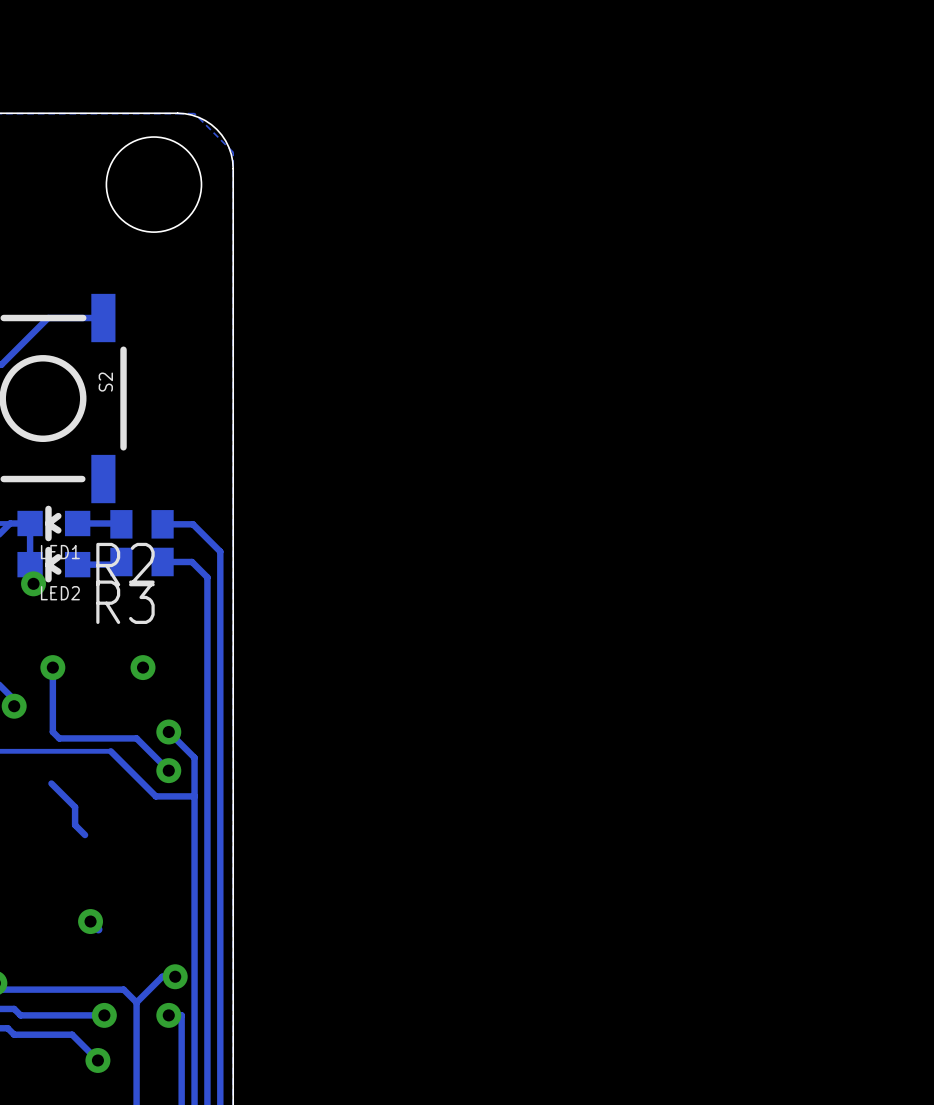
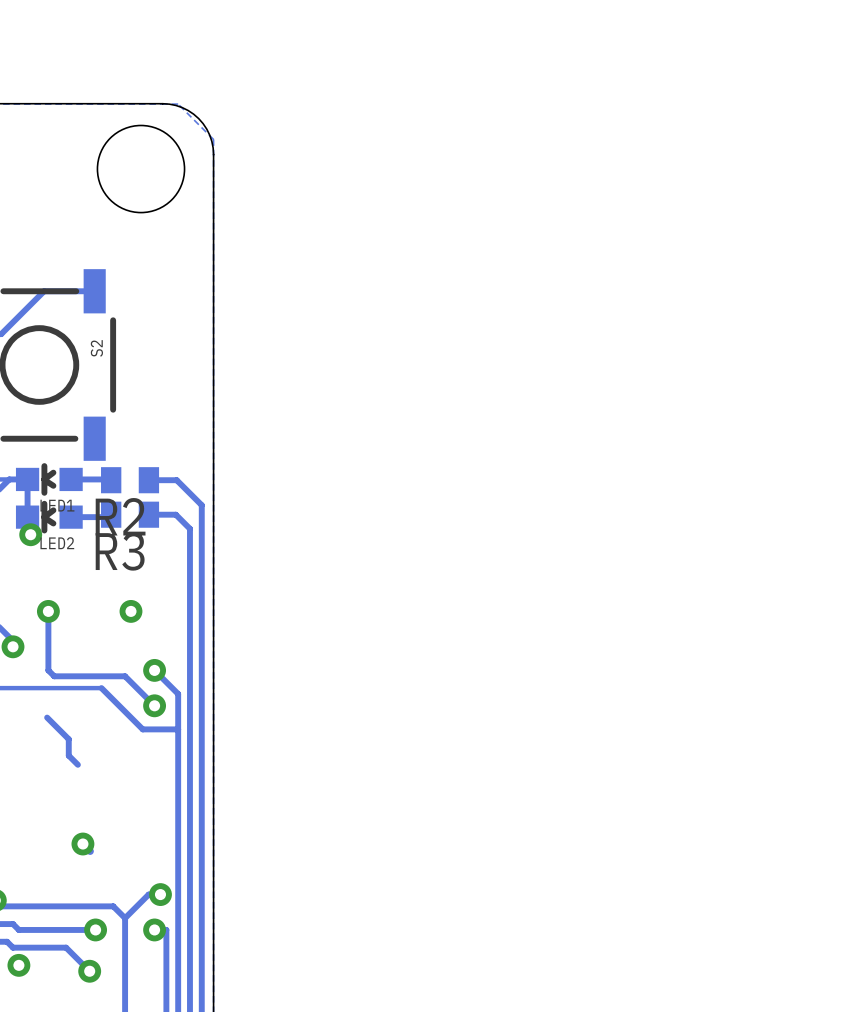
via: none -> (18, 965)

